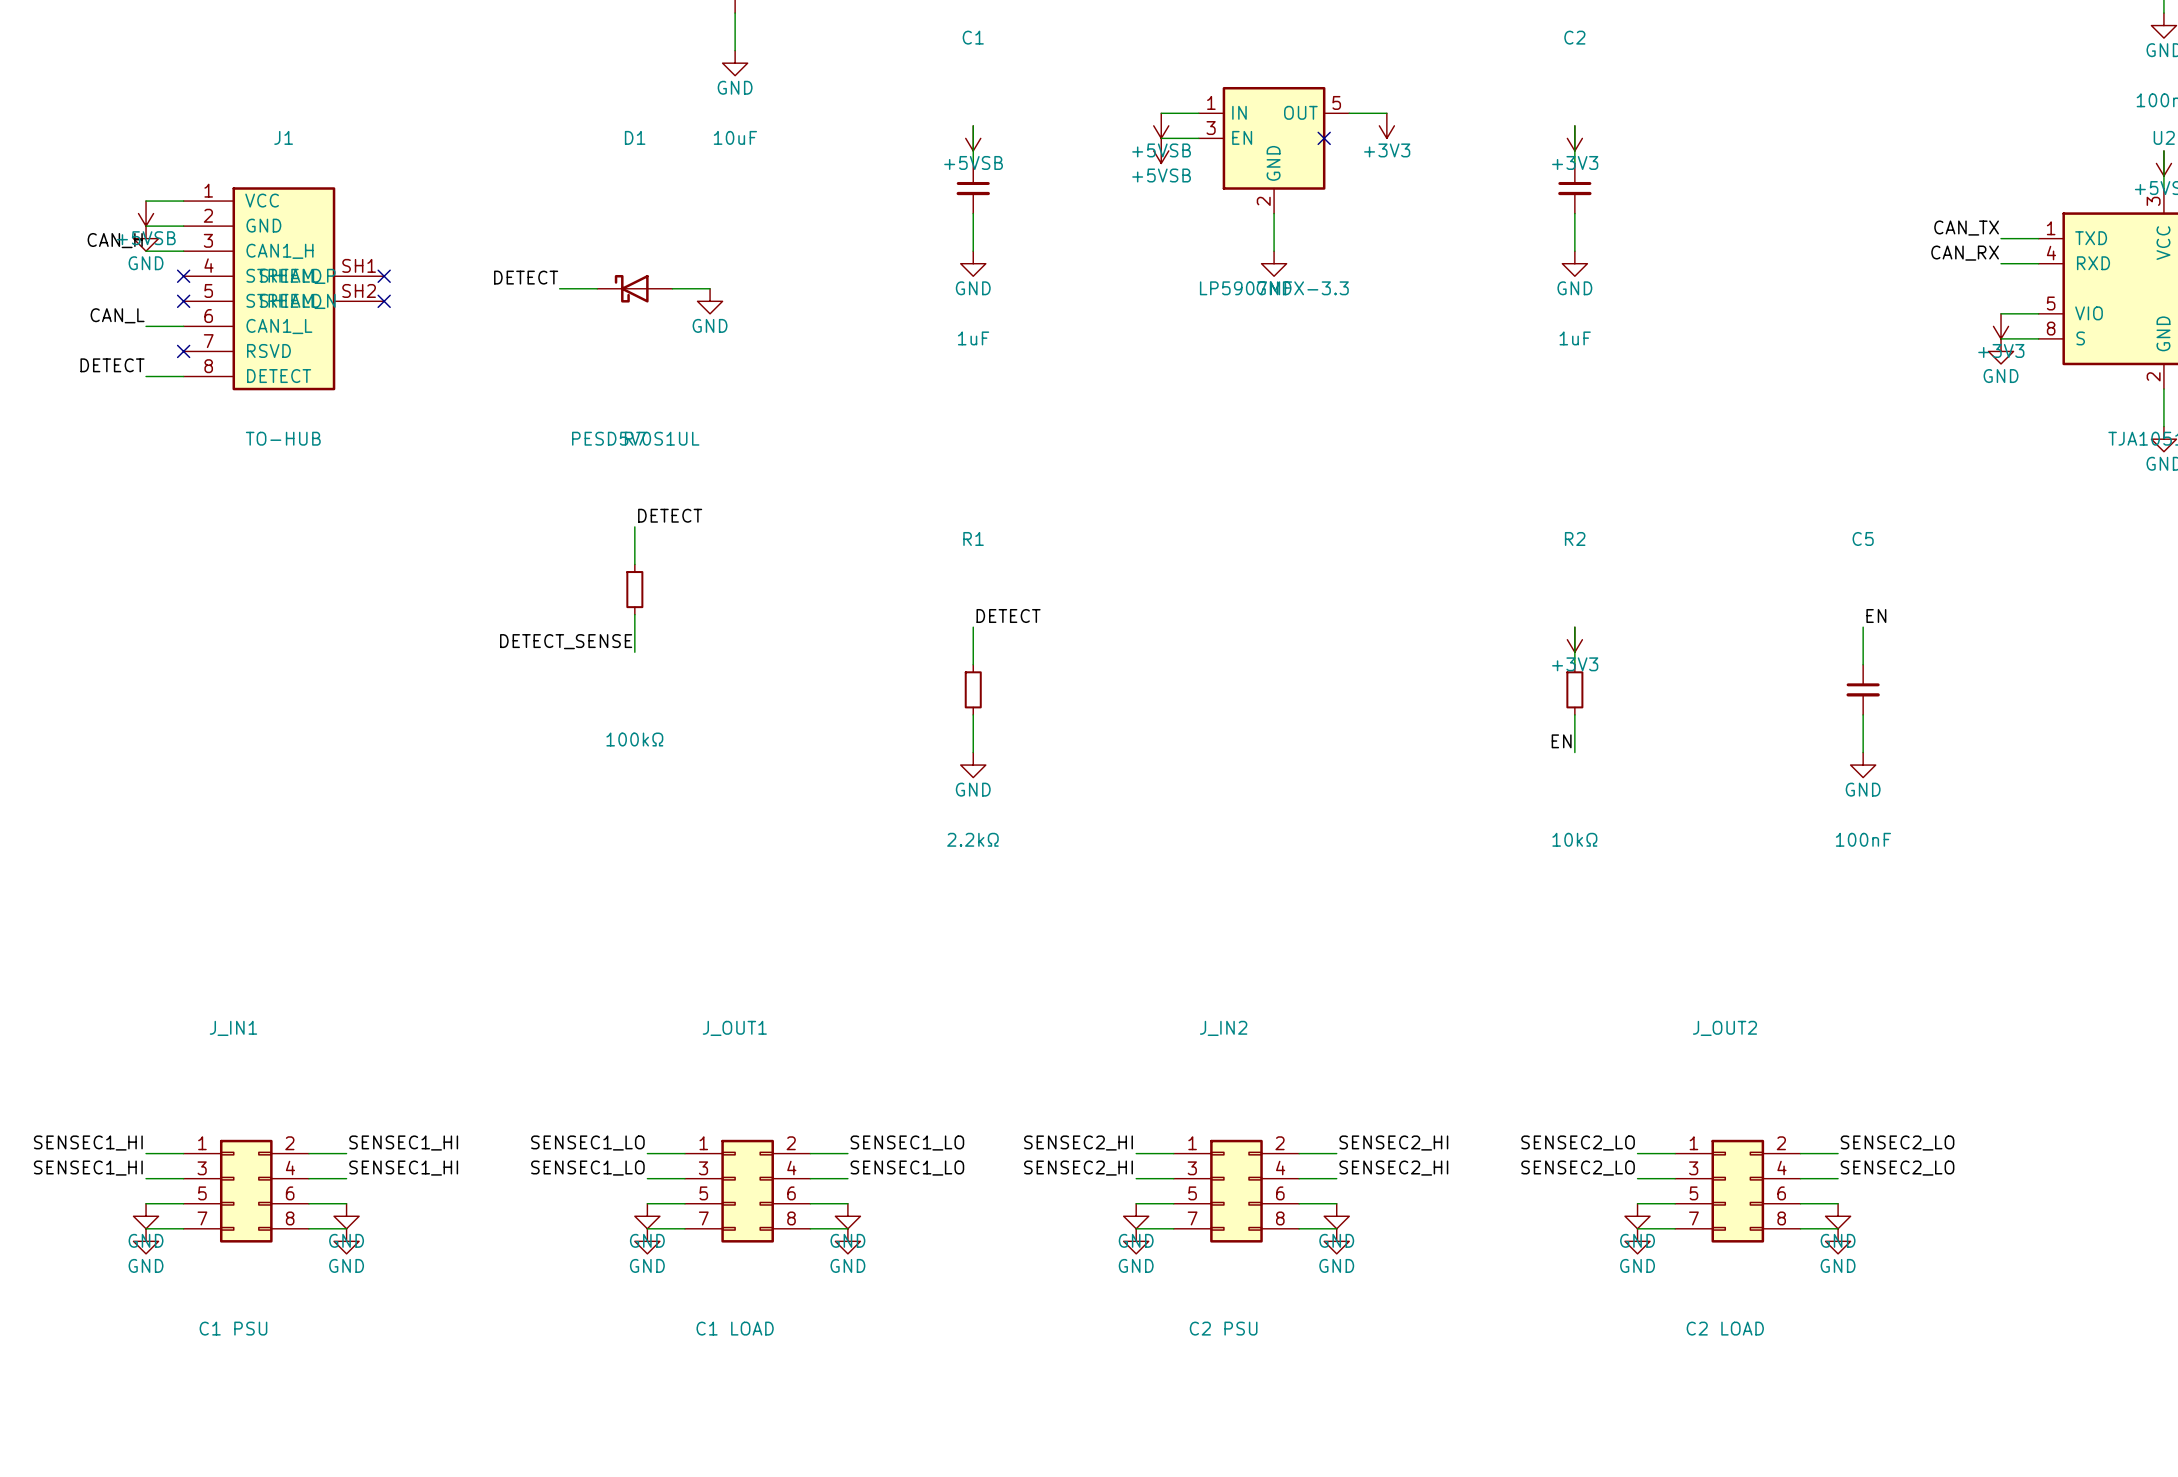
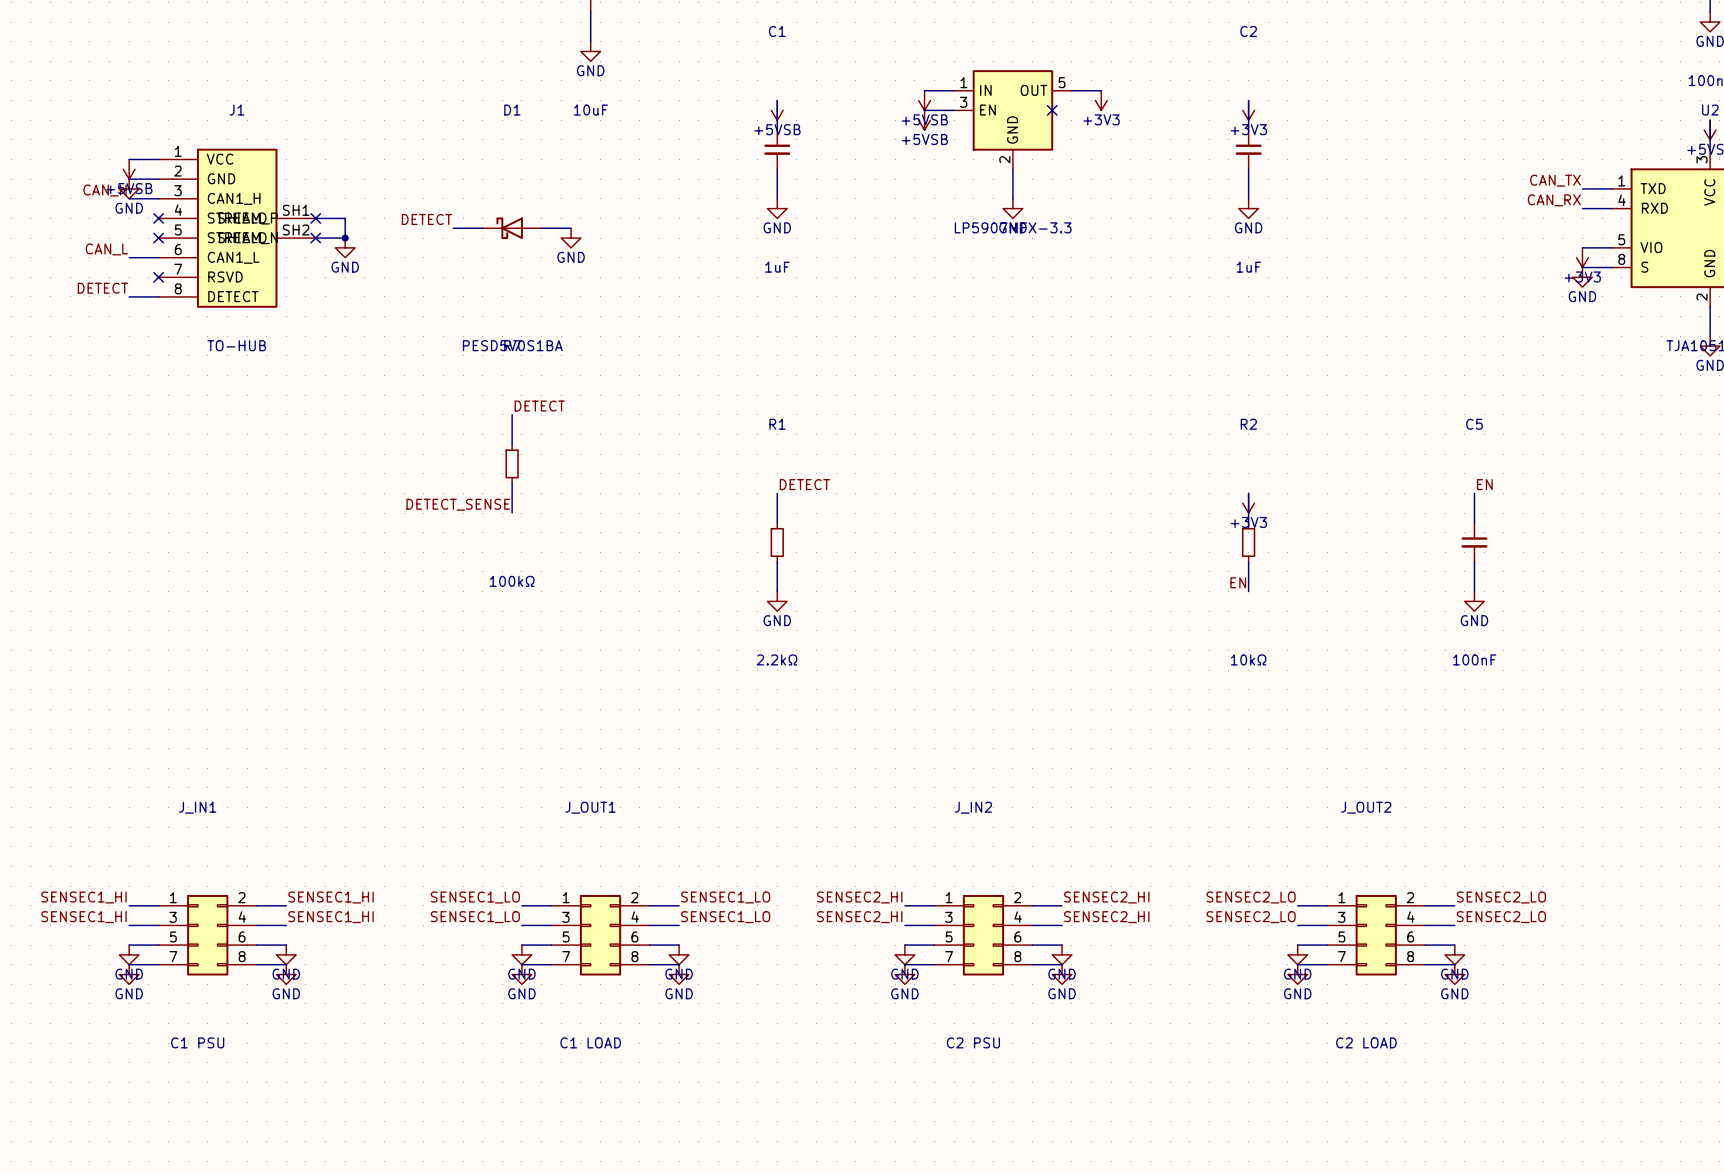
wire: none -> (315, 218) (345, 218) (345, 238) (315, 238)
junction: none -> (345, 238)
power symbol: none -> GND (345, 247)
D1 value: PESD5V0S1UL (635, 438) -> PESD5V0S1BA (512, 345)

